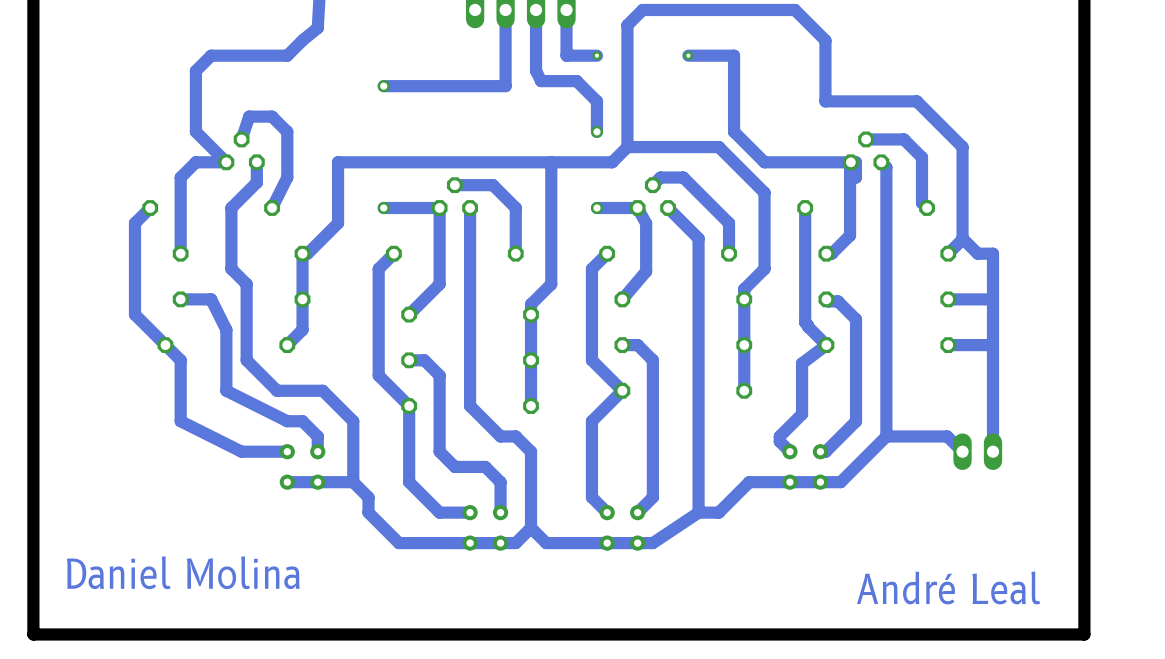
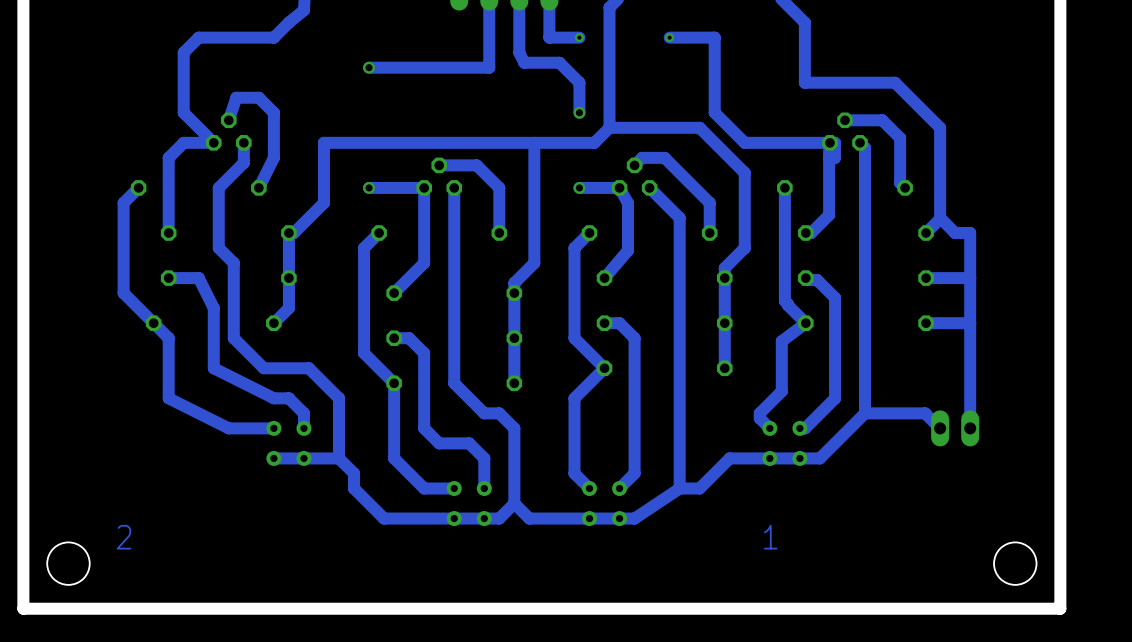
text: none -> 1 (770, 537)
text: none -> 2 (124, 537)
round board edge: none -> [46, 541, 91, 586]
round board edge: none -> [993, 541, 1038, 586]
text: Daniel Molina (183, 572) -> none
text: André Leal (948, 587) -> none

